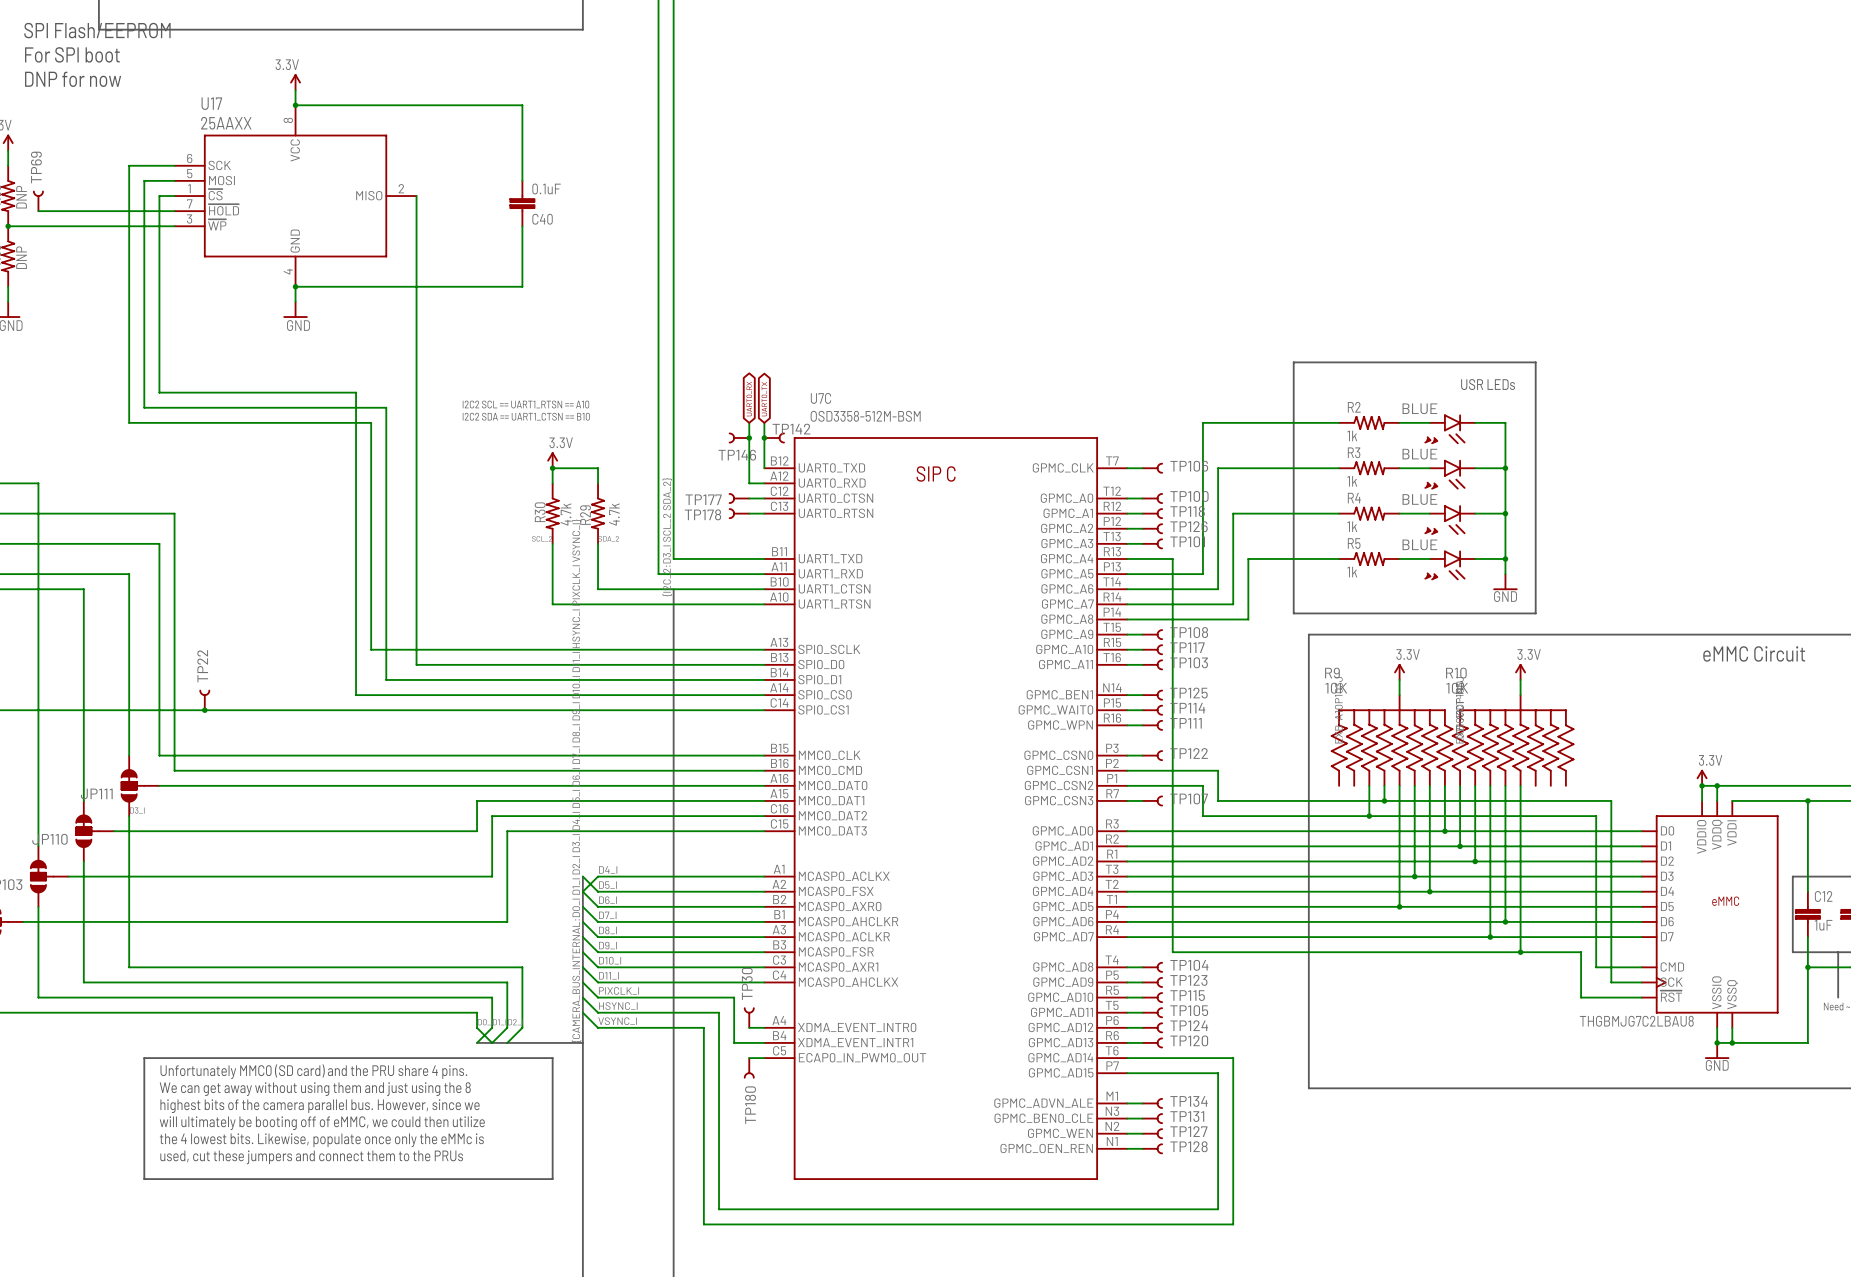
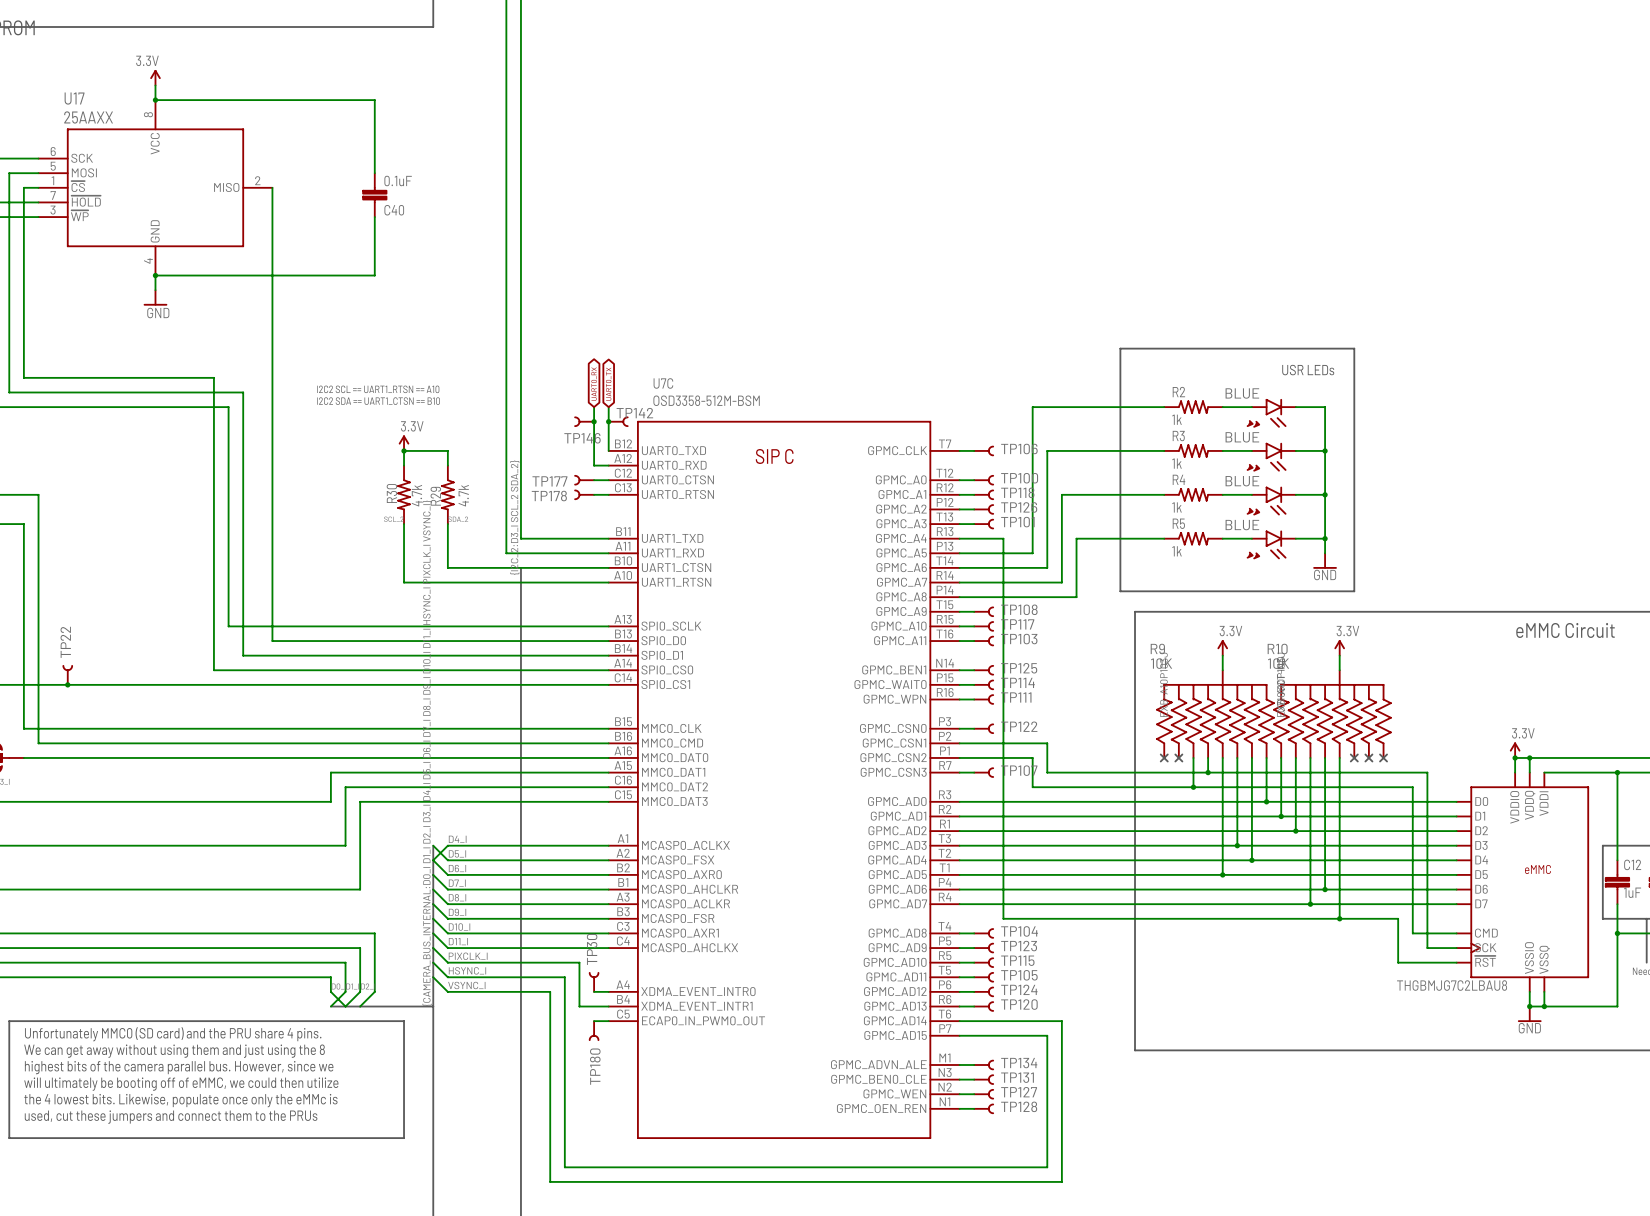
no-connect mark: none -> (1164, 757)
no-connect mark: none -> (1178, 757)
no-connect mark: none -> (1354, 757)
no-connect mark: none -> (1368, 757)
no-connect mark: none -> (1383, 757)

